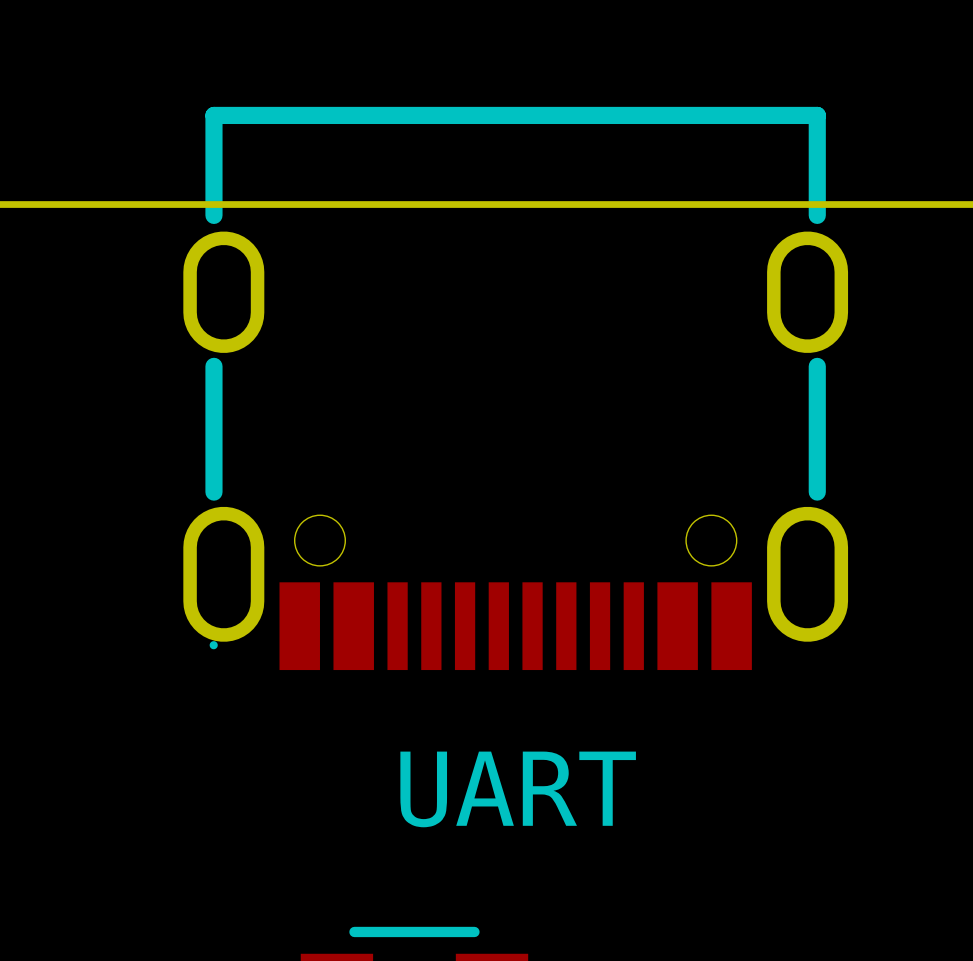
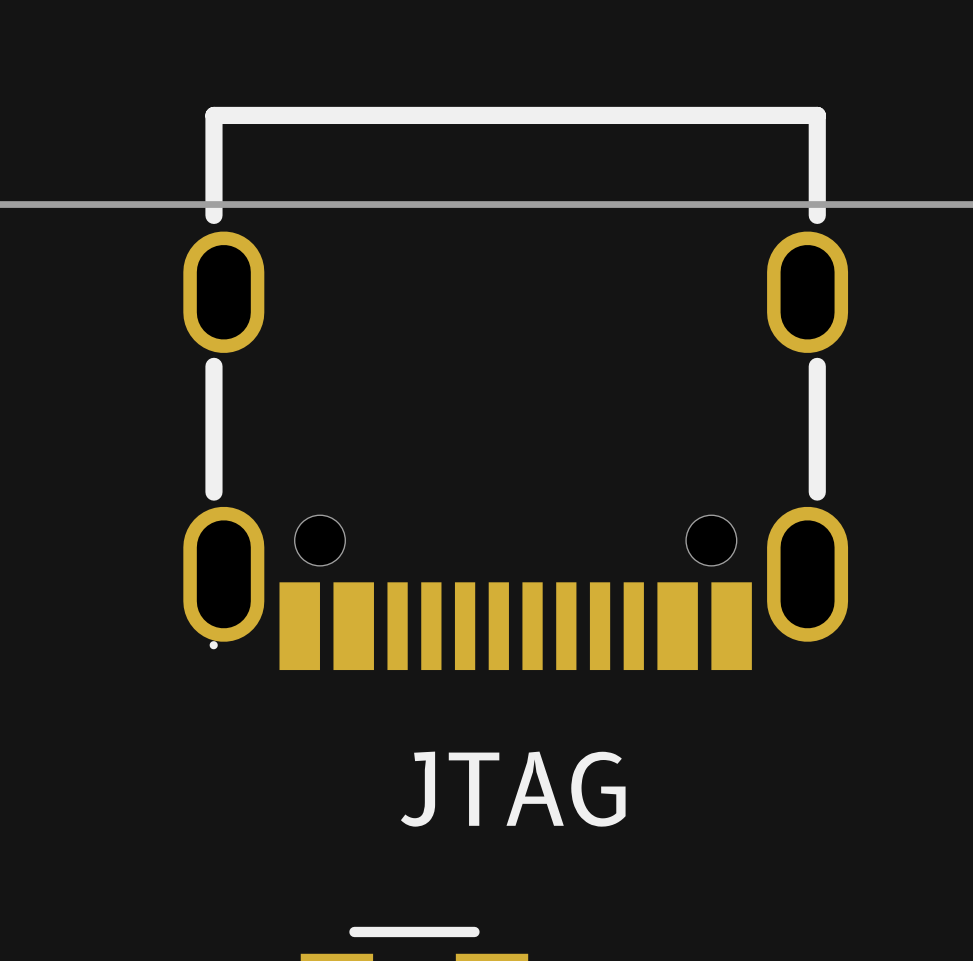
text: UART (518, 789) -> JTAG (513, 789)

